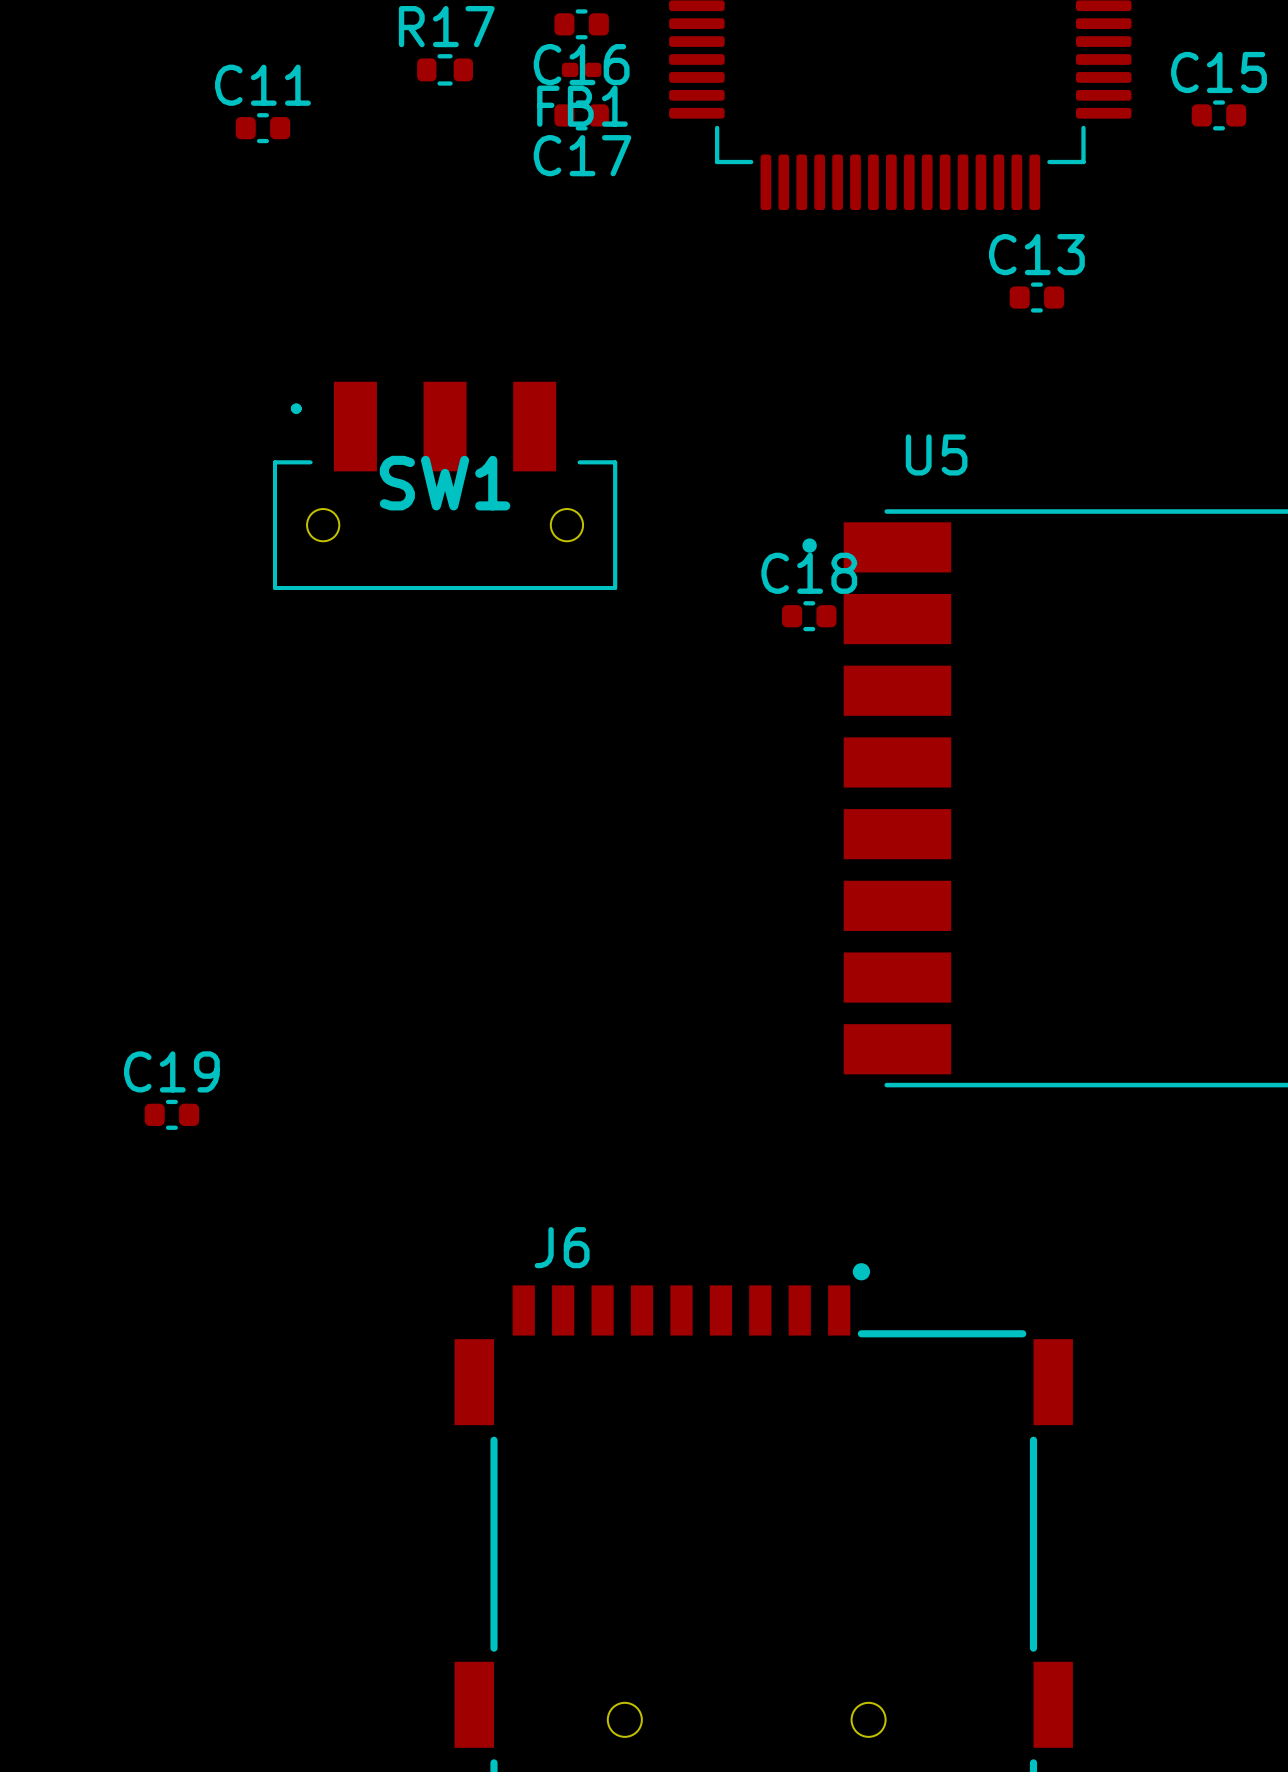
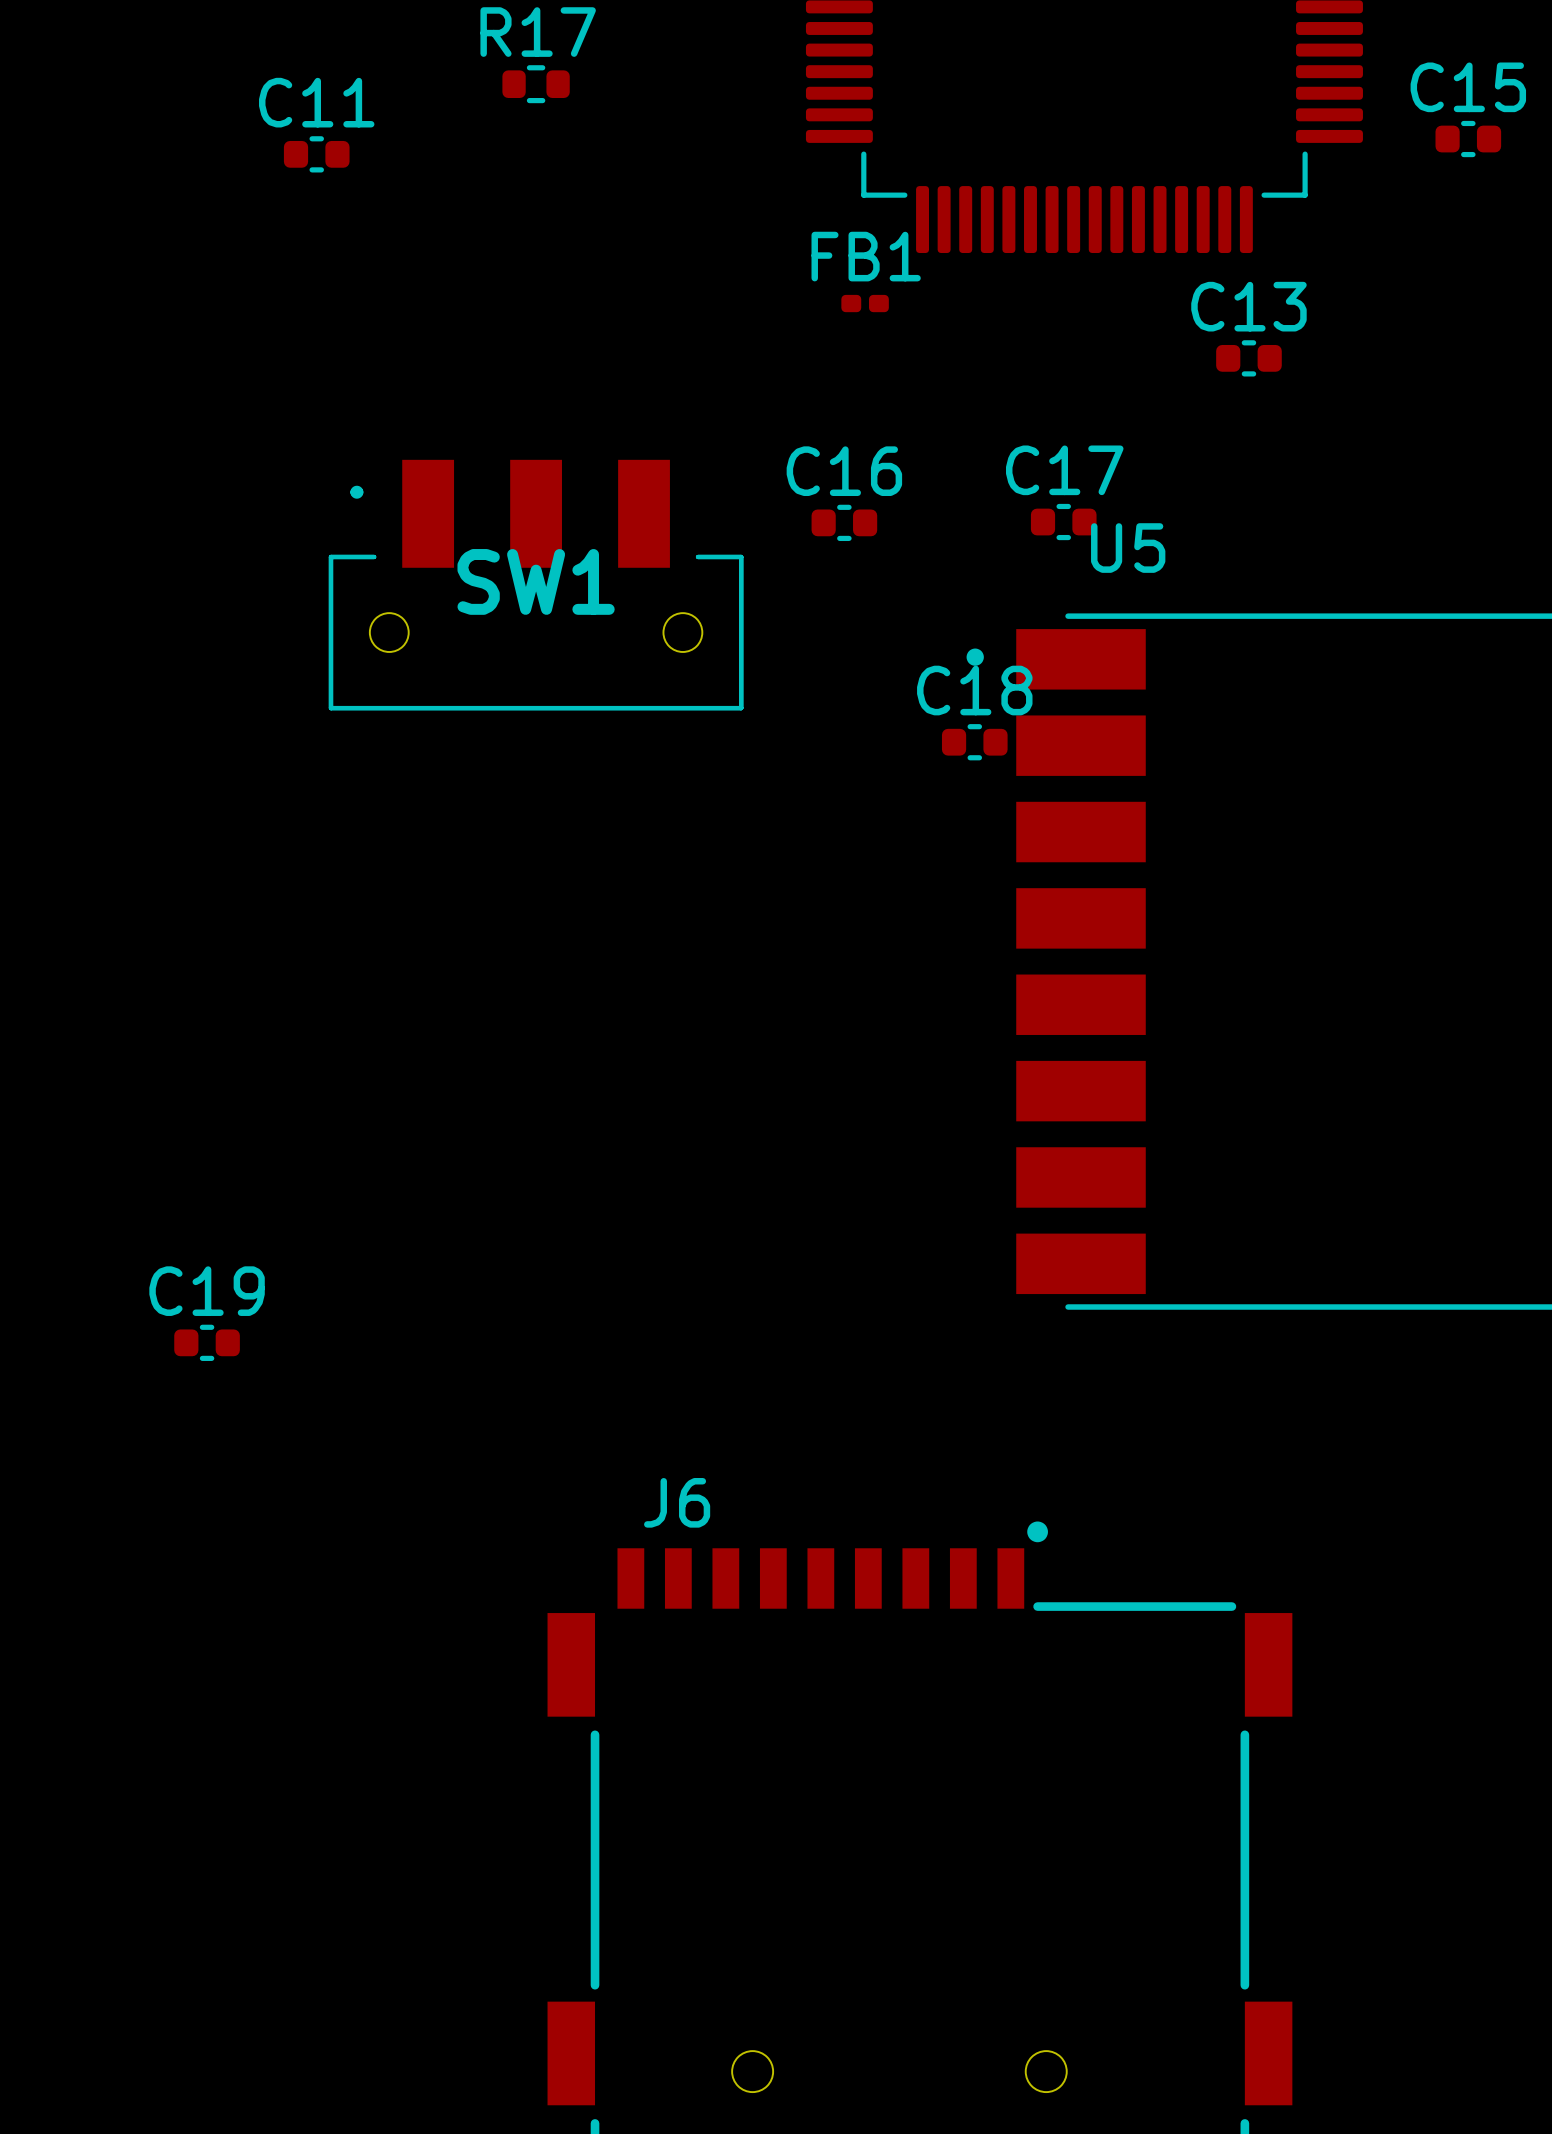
C16 position: (581, 24) -> (844, 522)
C16 name position: C16 (581, 64) -> C16 (844, 471)
FB1 position: (581, 69) -> (865, 303)
FB1 name position: FB1 (582, 106) -> FB1 (866, 256)
C17 position: (581, 115) -> (1063, 522)
C17 name position: C17 (582, 155) -> C17 (1064, 470)

